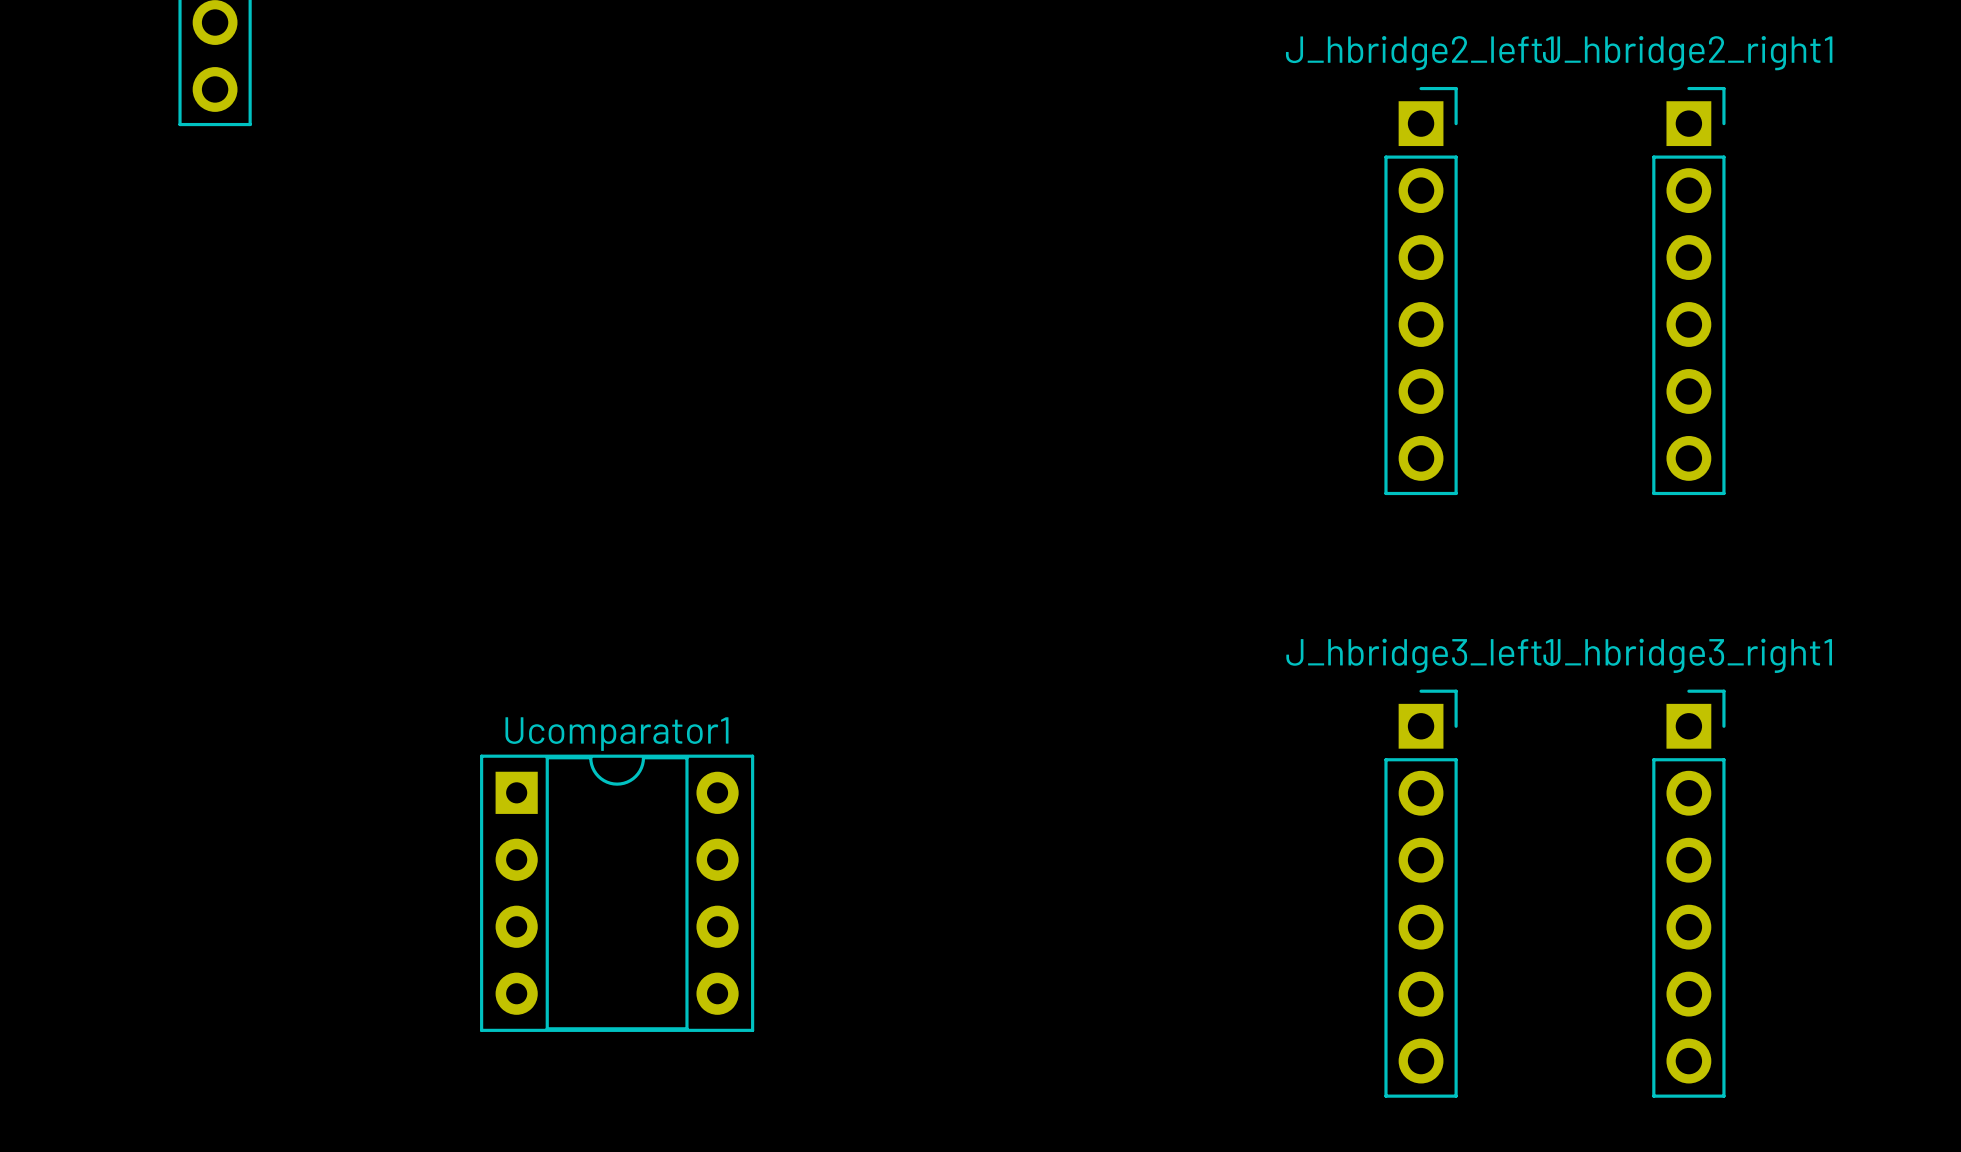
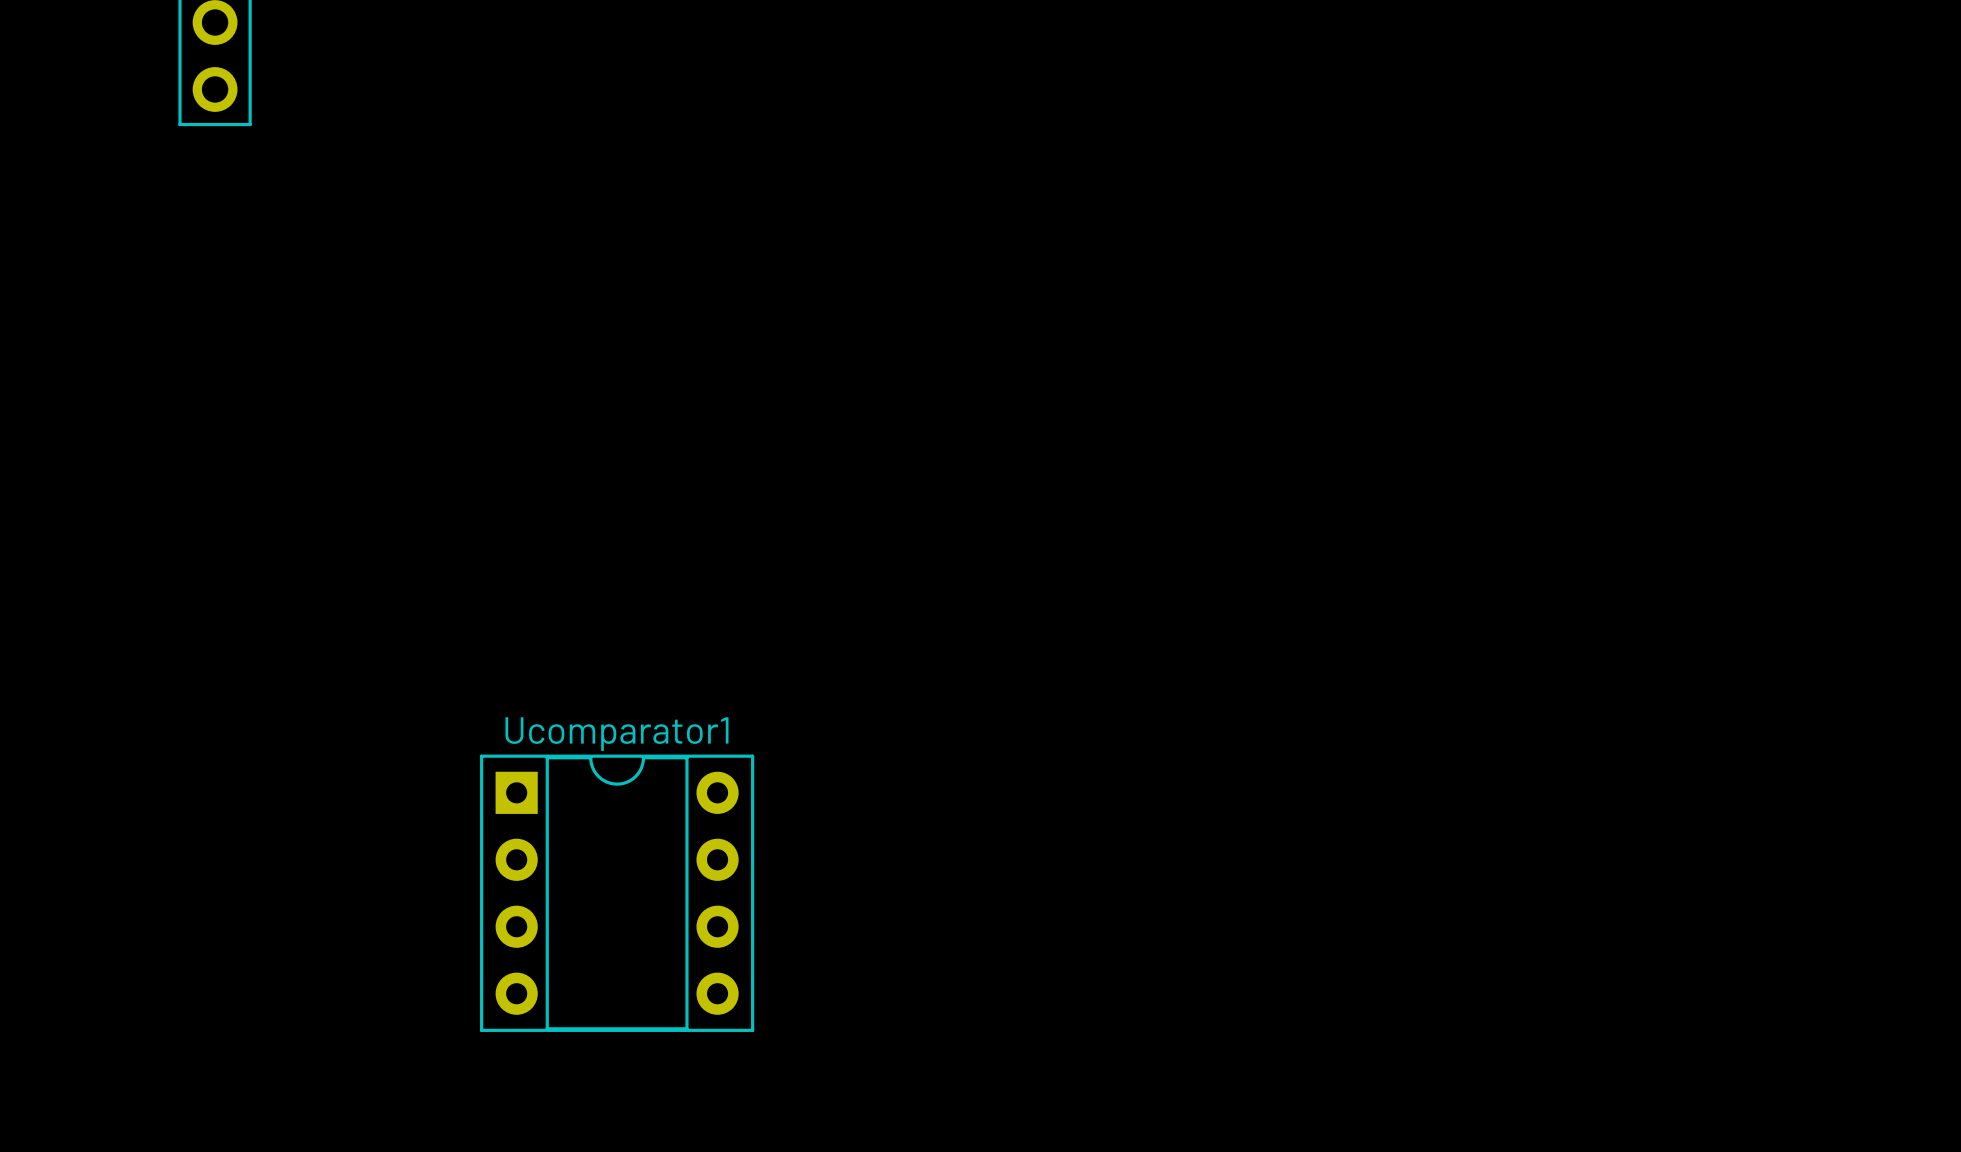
J_hbridge2_left1: (1421, 291) -> none
J_hbridge2_right1: (1688, 291) -> none
J_hbridge3_left1: (1421, 893) -> none
J_hbridge3_right1: (1688, 893) -> none

